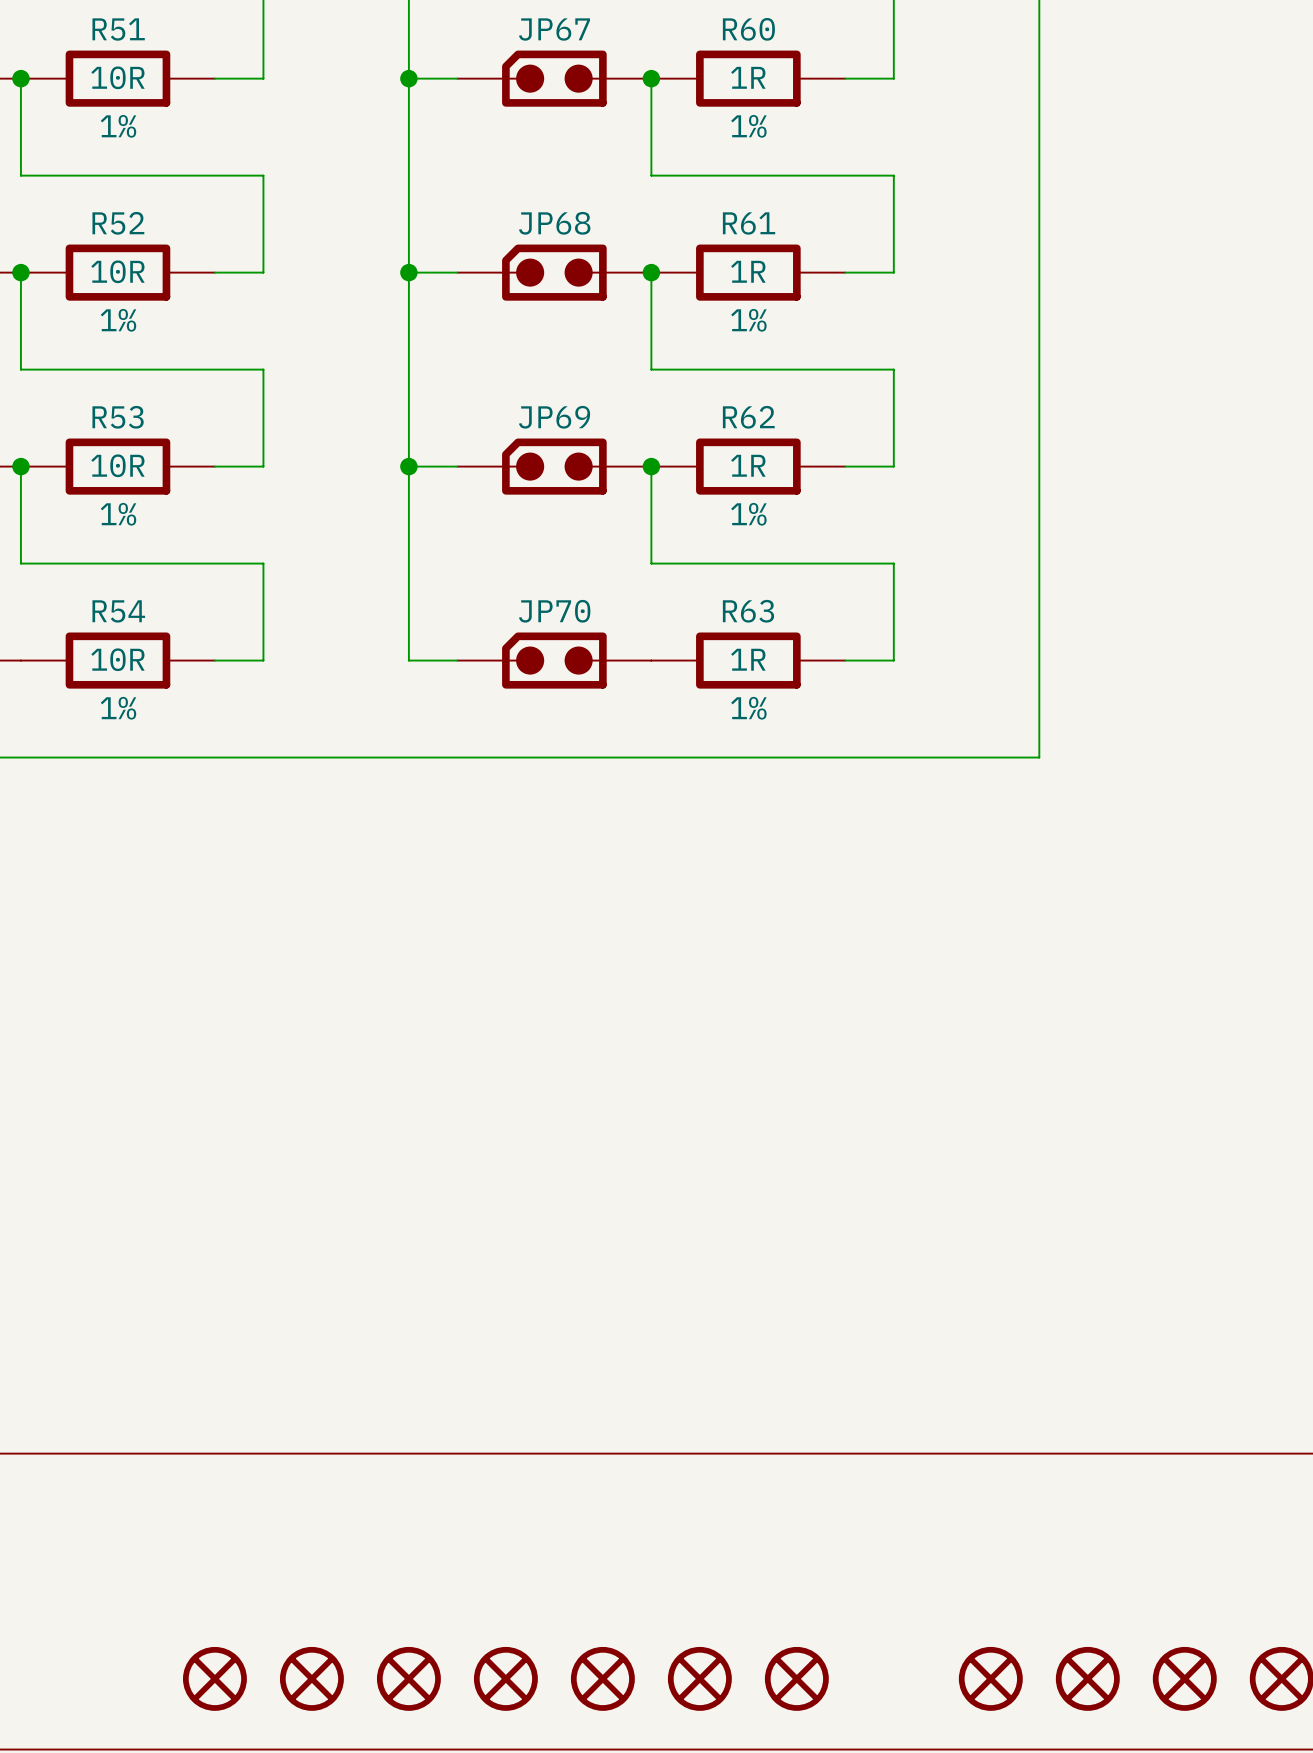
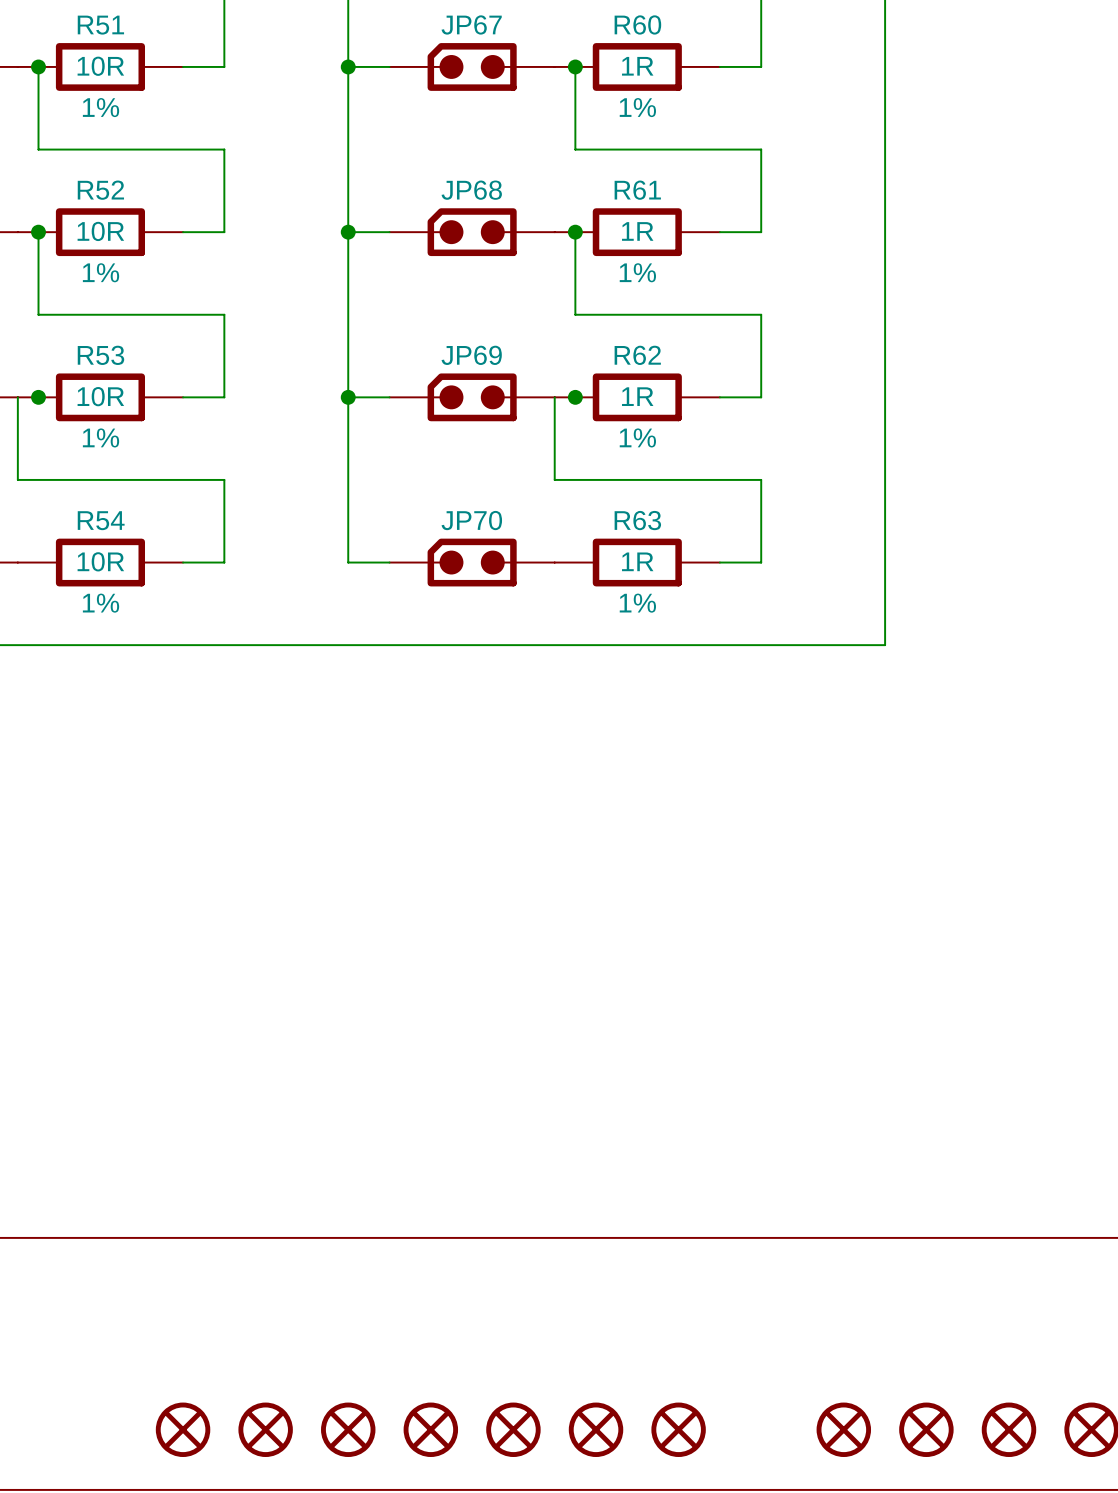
wire: (20, 78) (20, 175) (45, 175) -> (38, 66) (38, 149)
junction position: (20, 78) -> (38, 66)
wire: (651, 78) (651, 175) (675, 175) -> (575, 66) (575, 149)
junction position: (651, 78) -> (575, 66)
wire: (20, 272) (20, 369) (45, 369) -> (38, 232) (38, 314)
junction position: (20, 272) -> (38, 232)
wire: (651, 272) (651, 369) (675, 369) -> (575, 232) (575, 314)
junction position: (651, 272) -> (575, 232)
junction position: (20, 466) -> (38, 397)
junction position: (651, 466) -> (575, 397)

